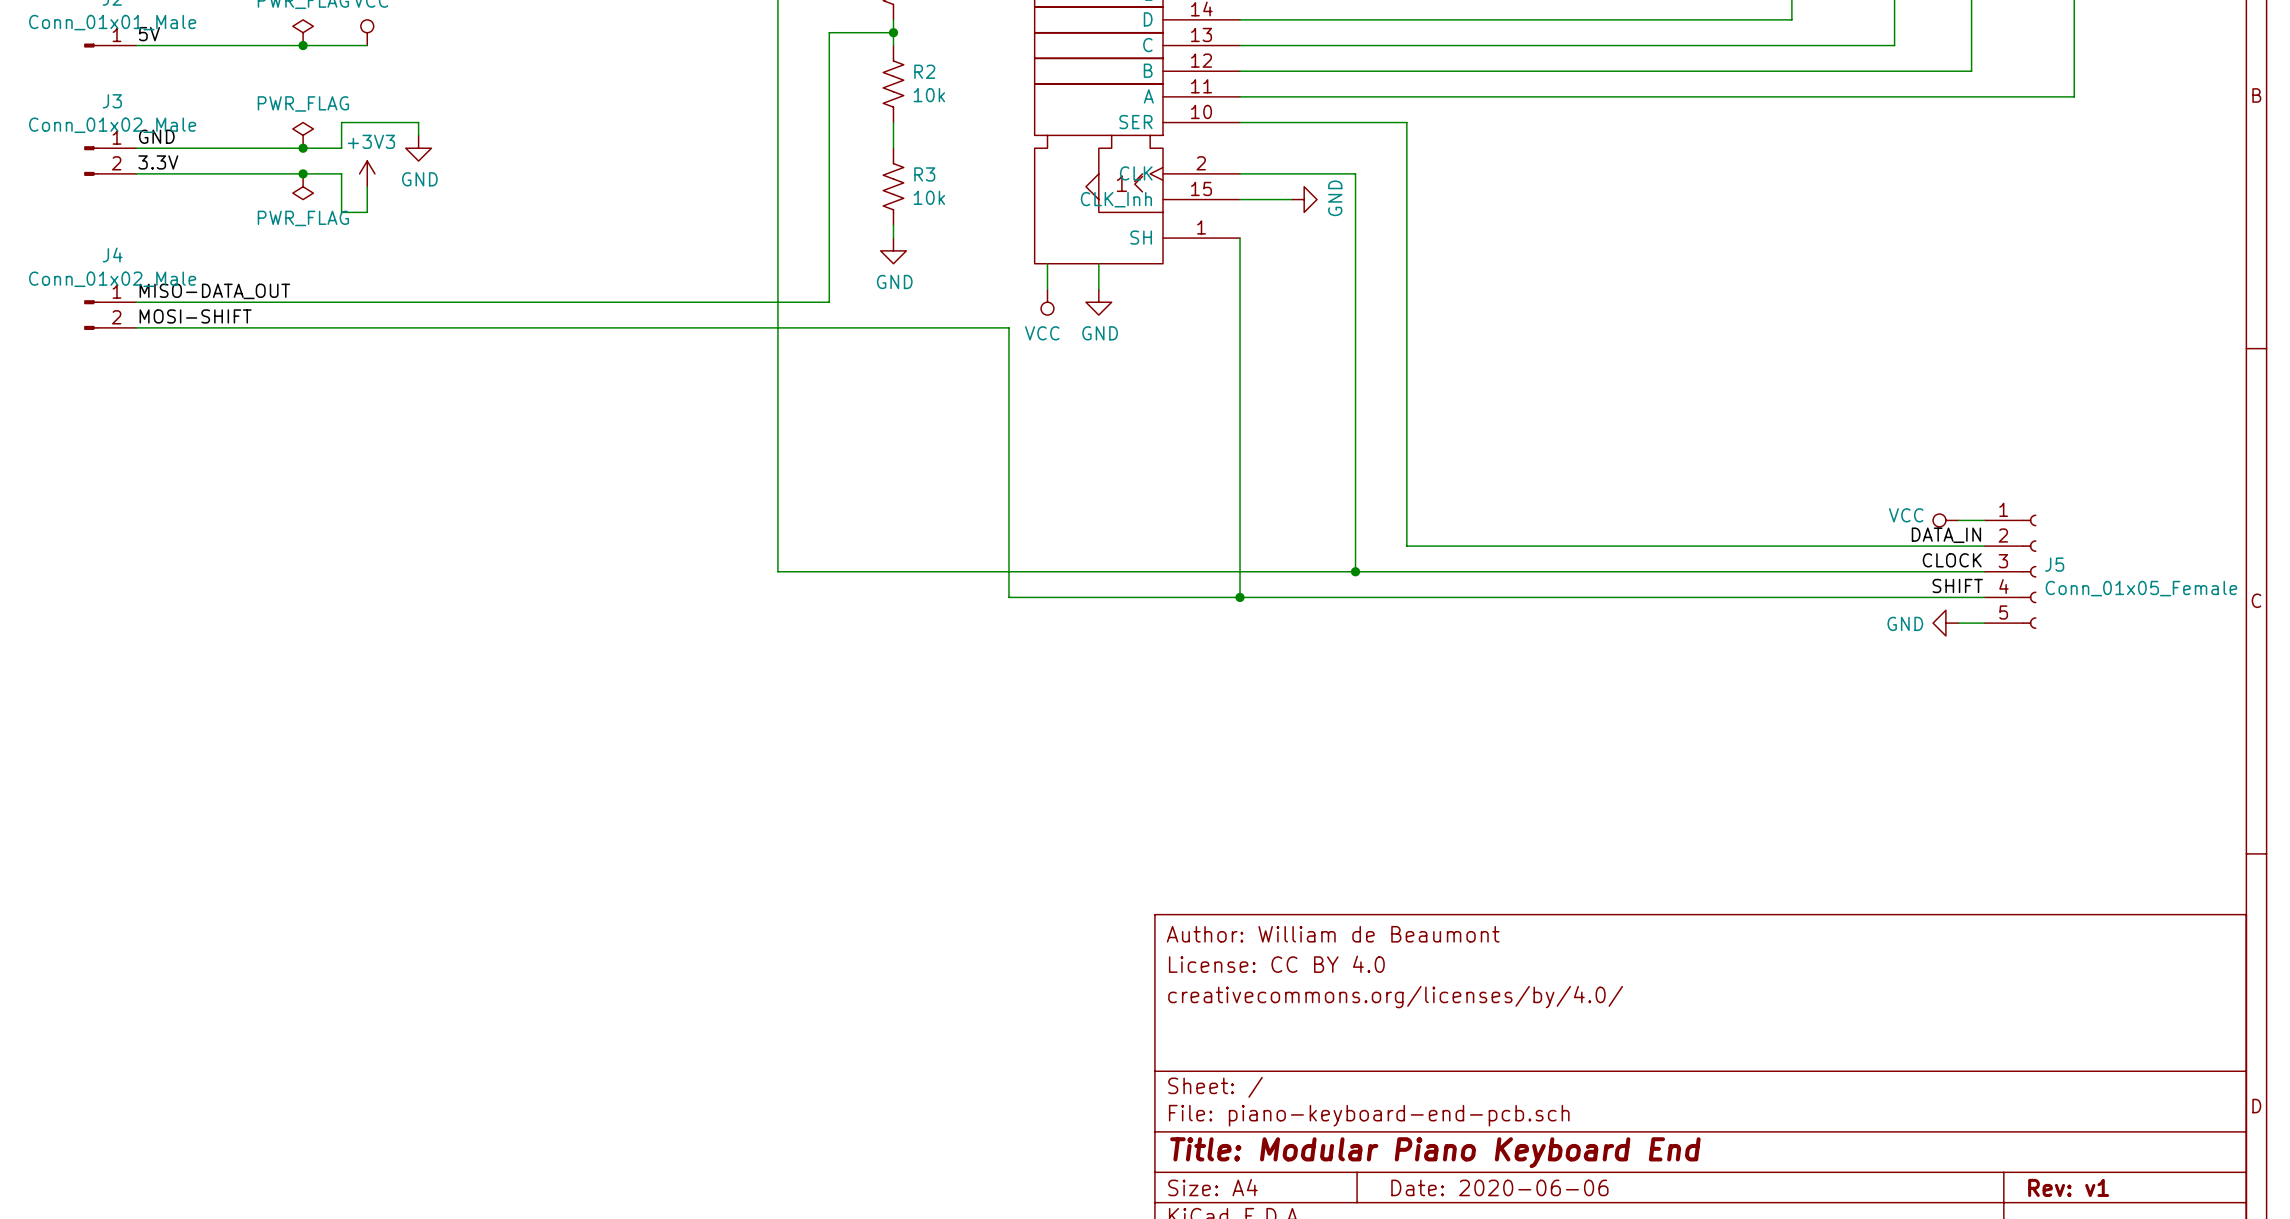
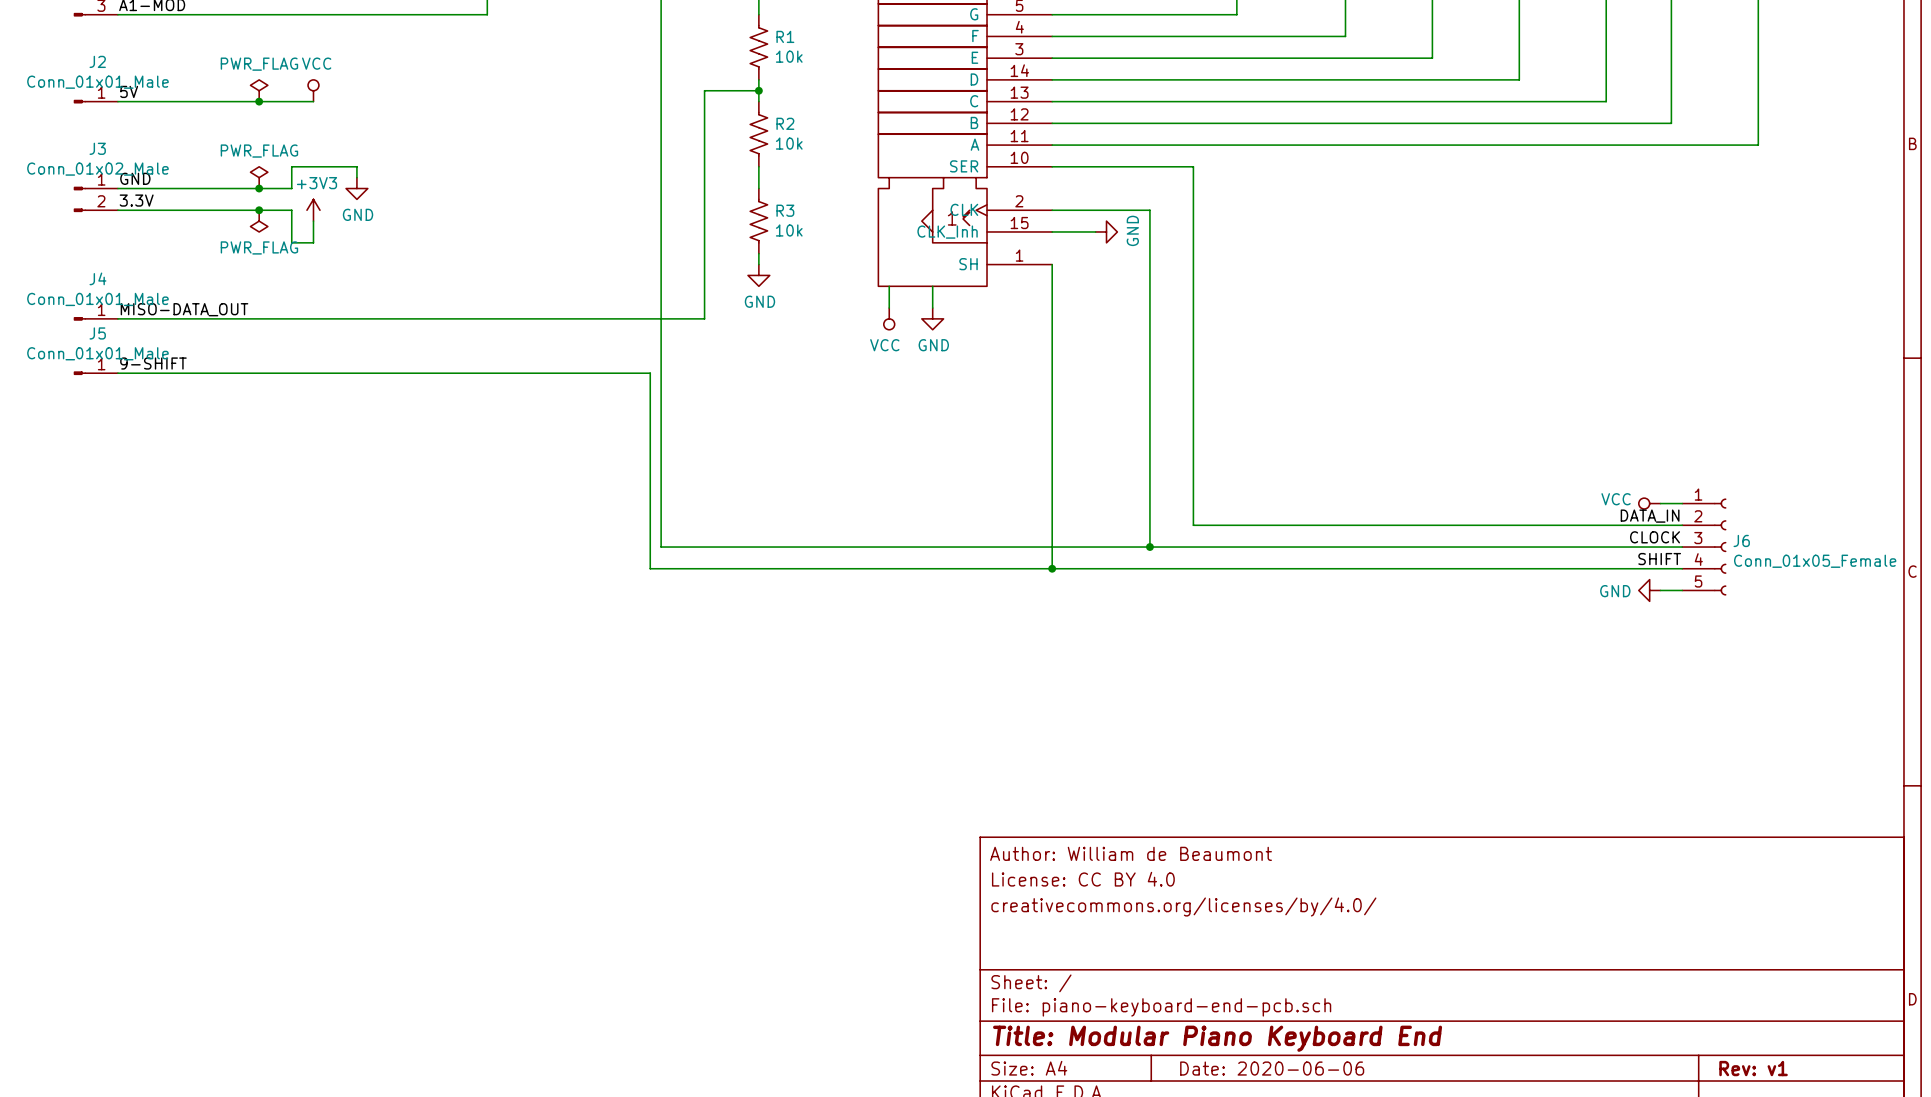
J4 value: Conn_01x02_Male (112, 279) -> Conn_01x01_Male (97, 299)
J4 symbol: [84, 300, 137, 330] -> [73, 317, 118, 321]
label: MOSI-SHIFT (195, 316) -> none
wire: (136, 327) (1008, 327) (1008, 597) -> (117, 373) (650, 373) (650, 568) (856, 568)
label: none -> 9-SHIFT (153, 363)
J5: none -> Conn_01x01_Male (95, 373)
J5 name: J5 (2054, 564) -> J6 (1741, 540)

